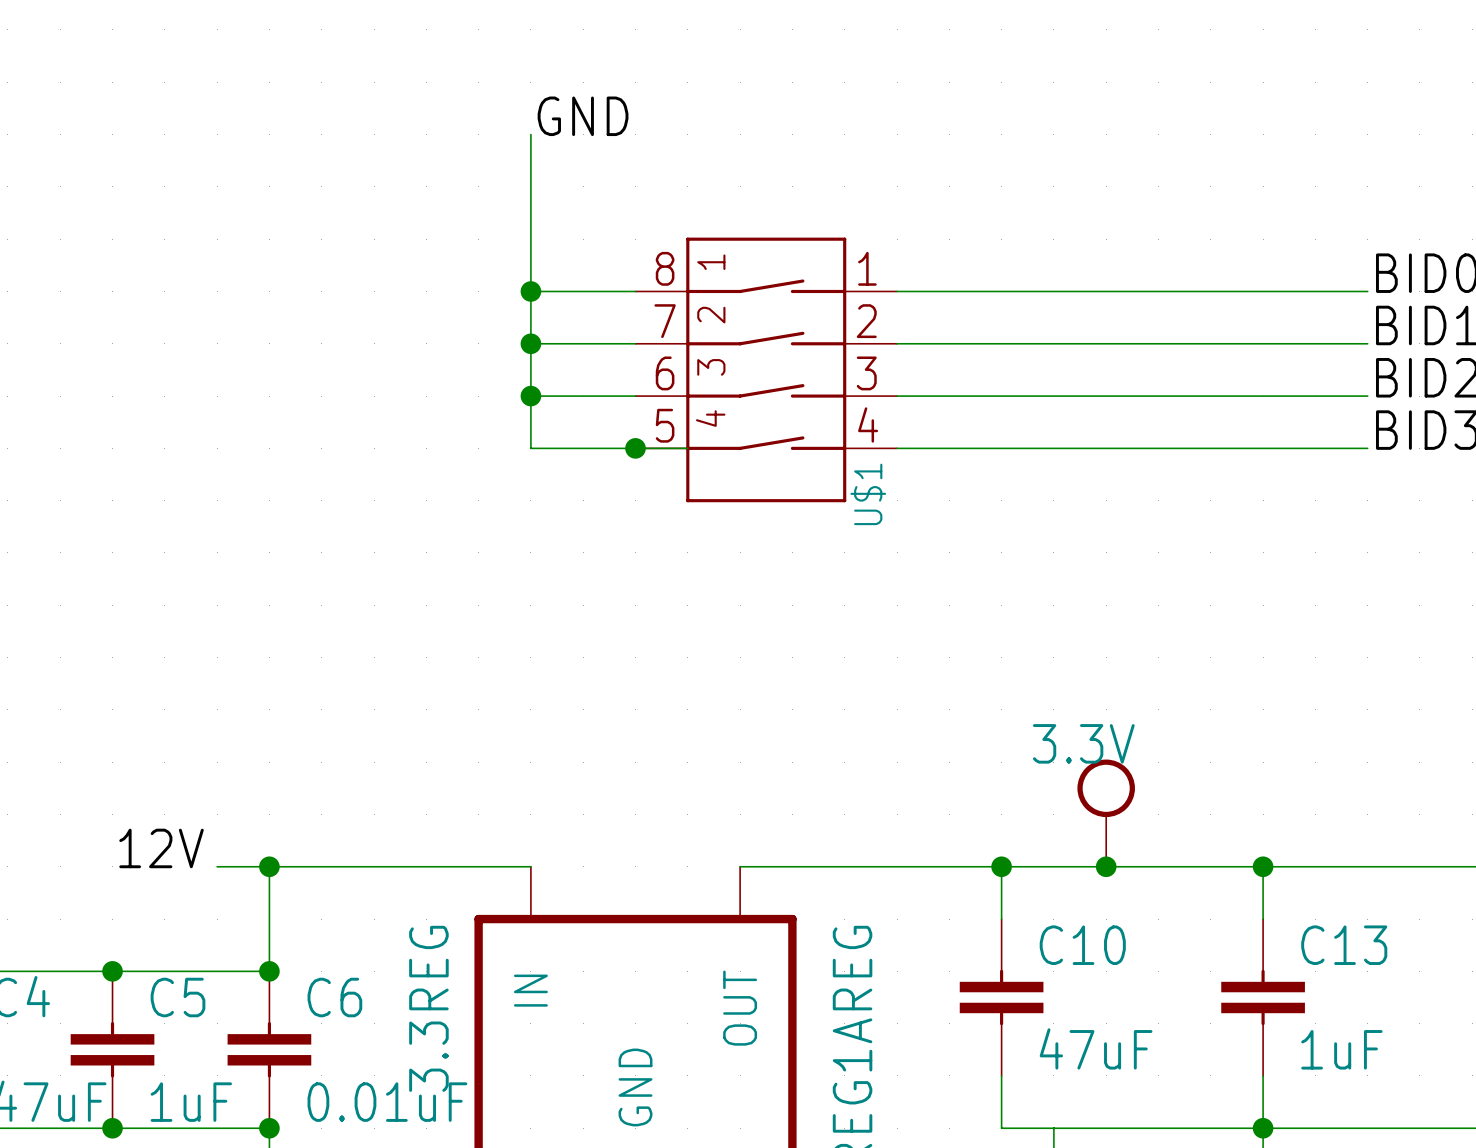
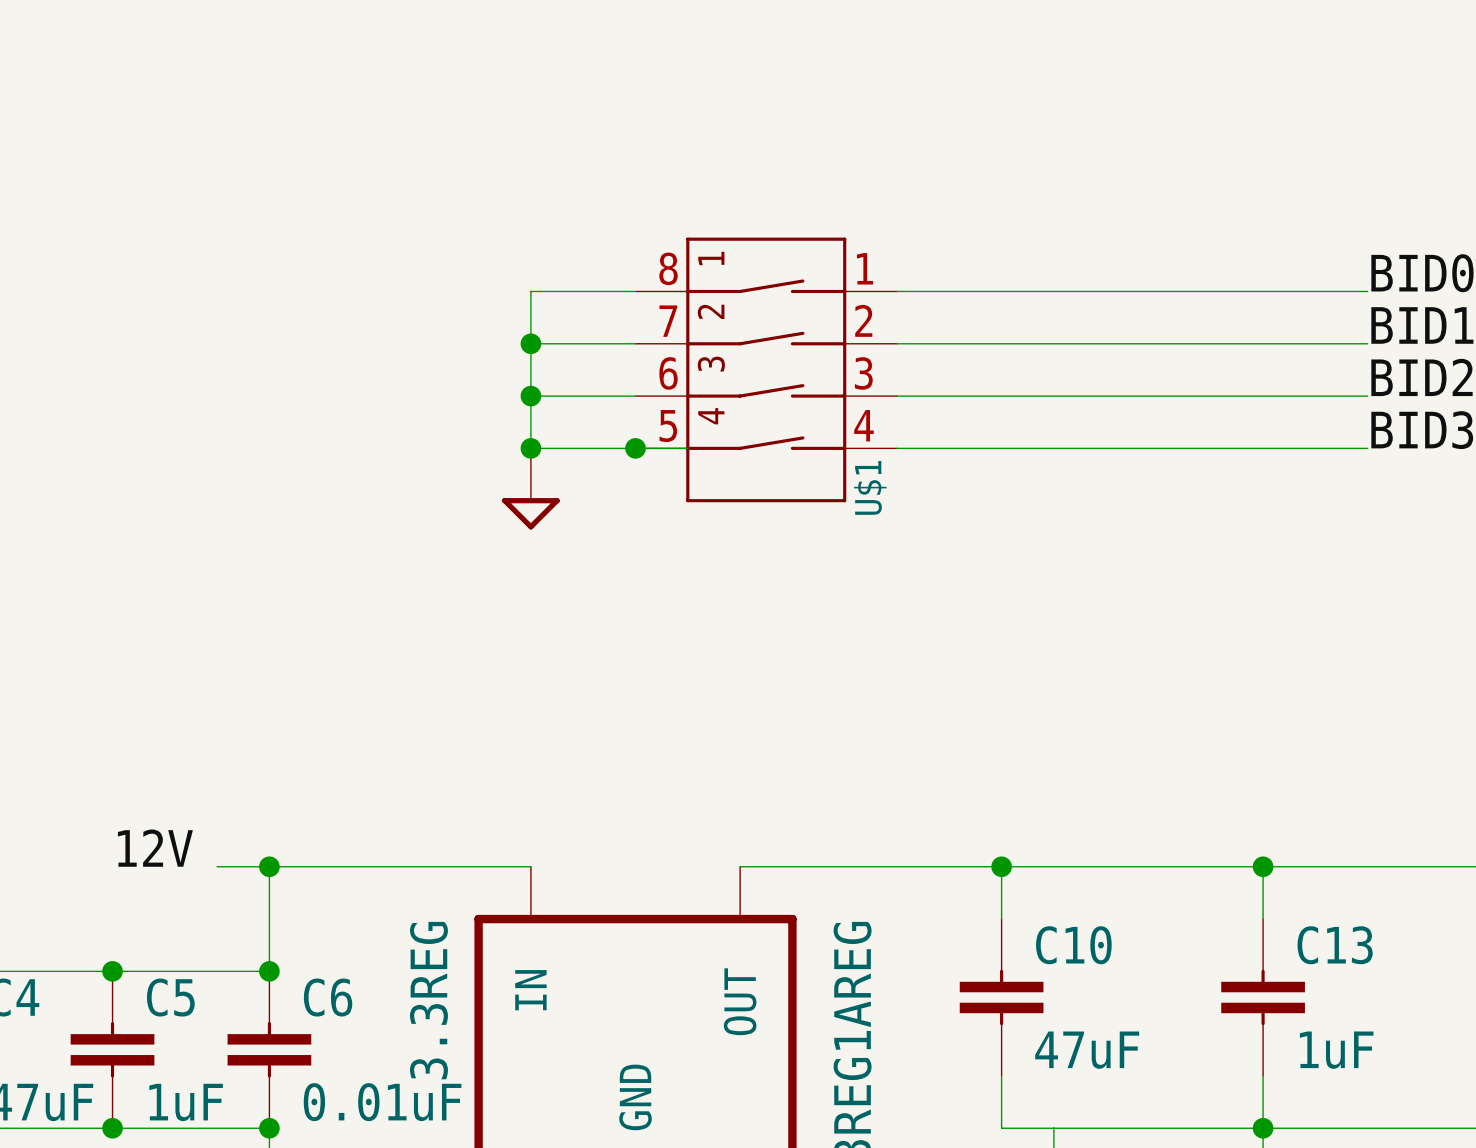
label: GND (583, 116) -> none
wire: (530, 134) (530, 291) -> none
junction: (530, 291) -> none
junction: none -> (530, 448)
power symbol: none -> (530, 488)
3.3V: (1106, 813) -> none
junction: (1106, 866) -> none

